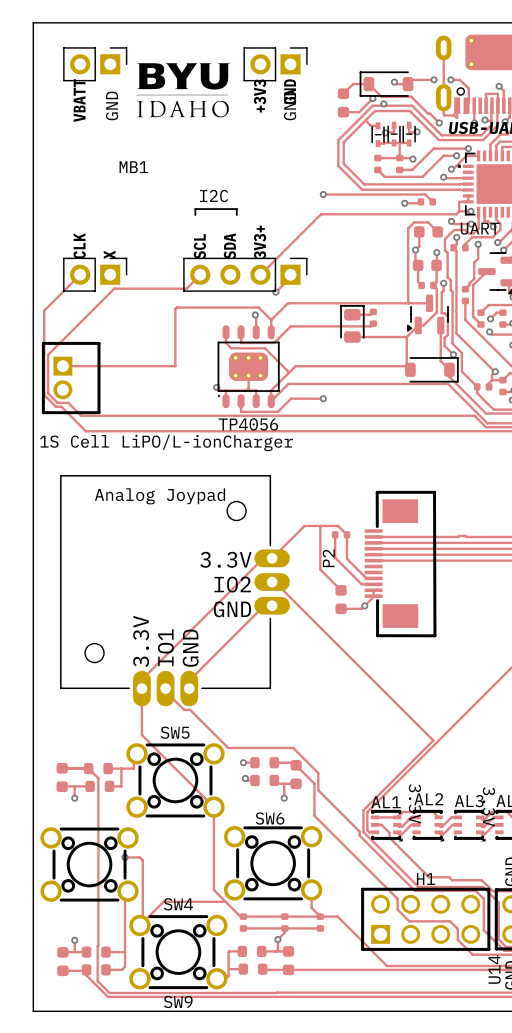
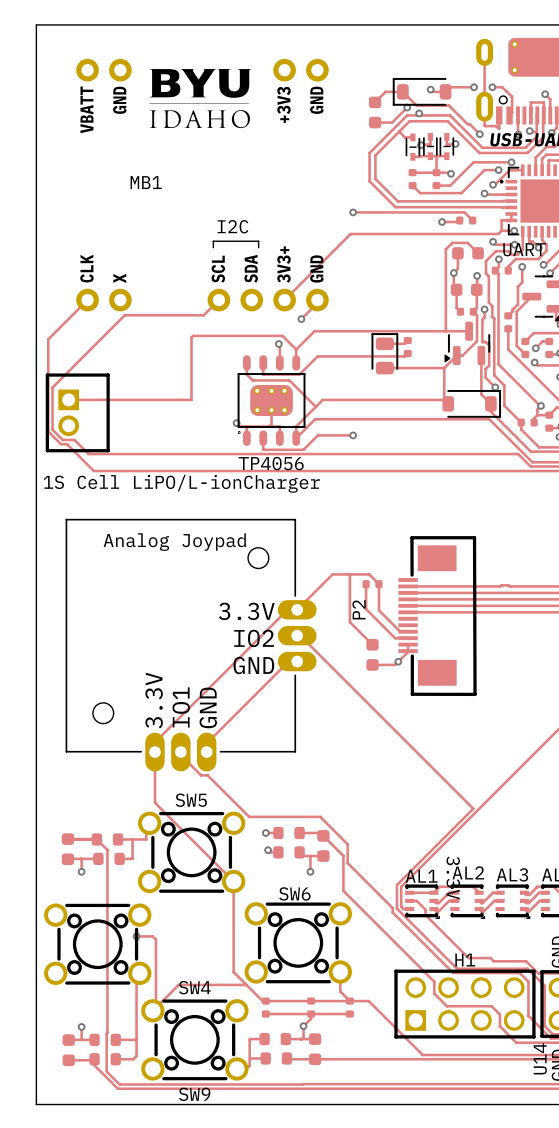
MB1 footprint: [63, 47, 308, 292] -> [76, 58, 329, 312]
text: 3.3V (488, 806) -> none

